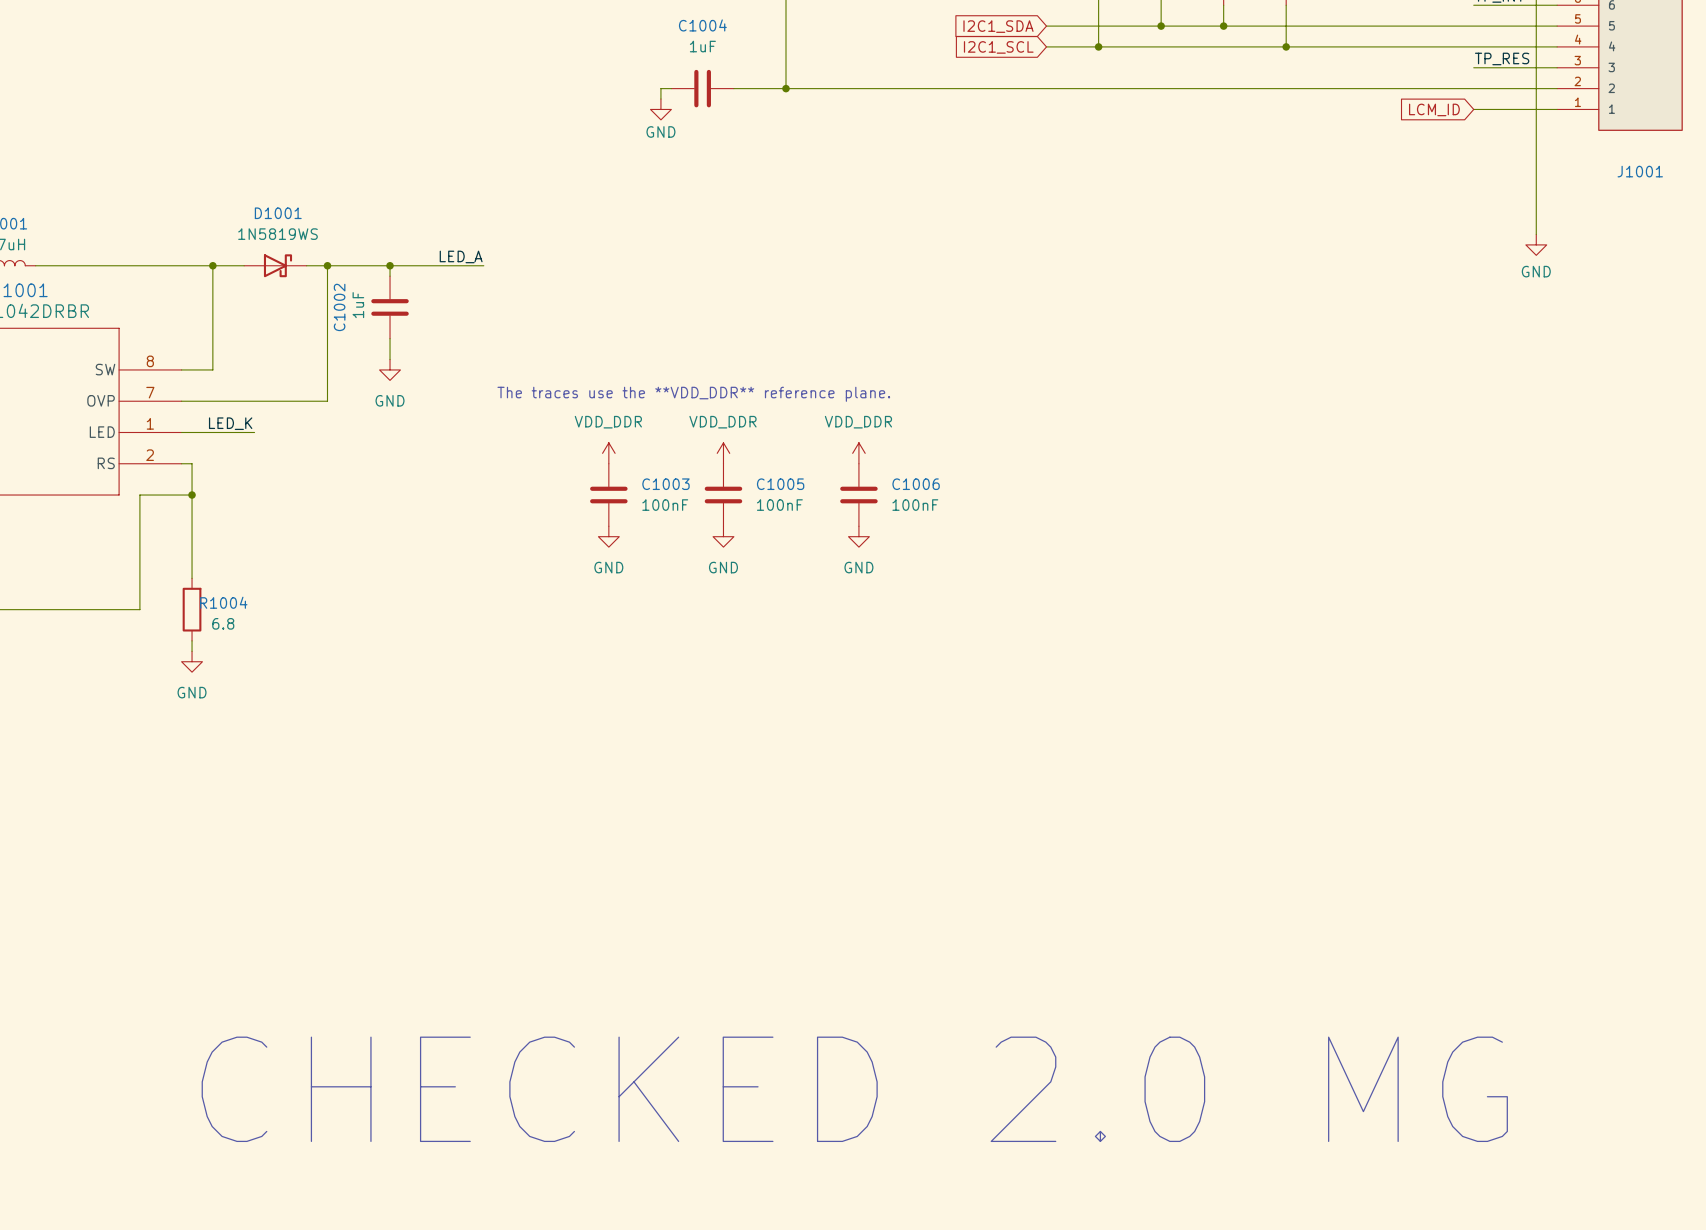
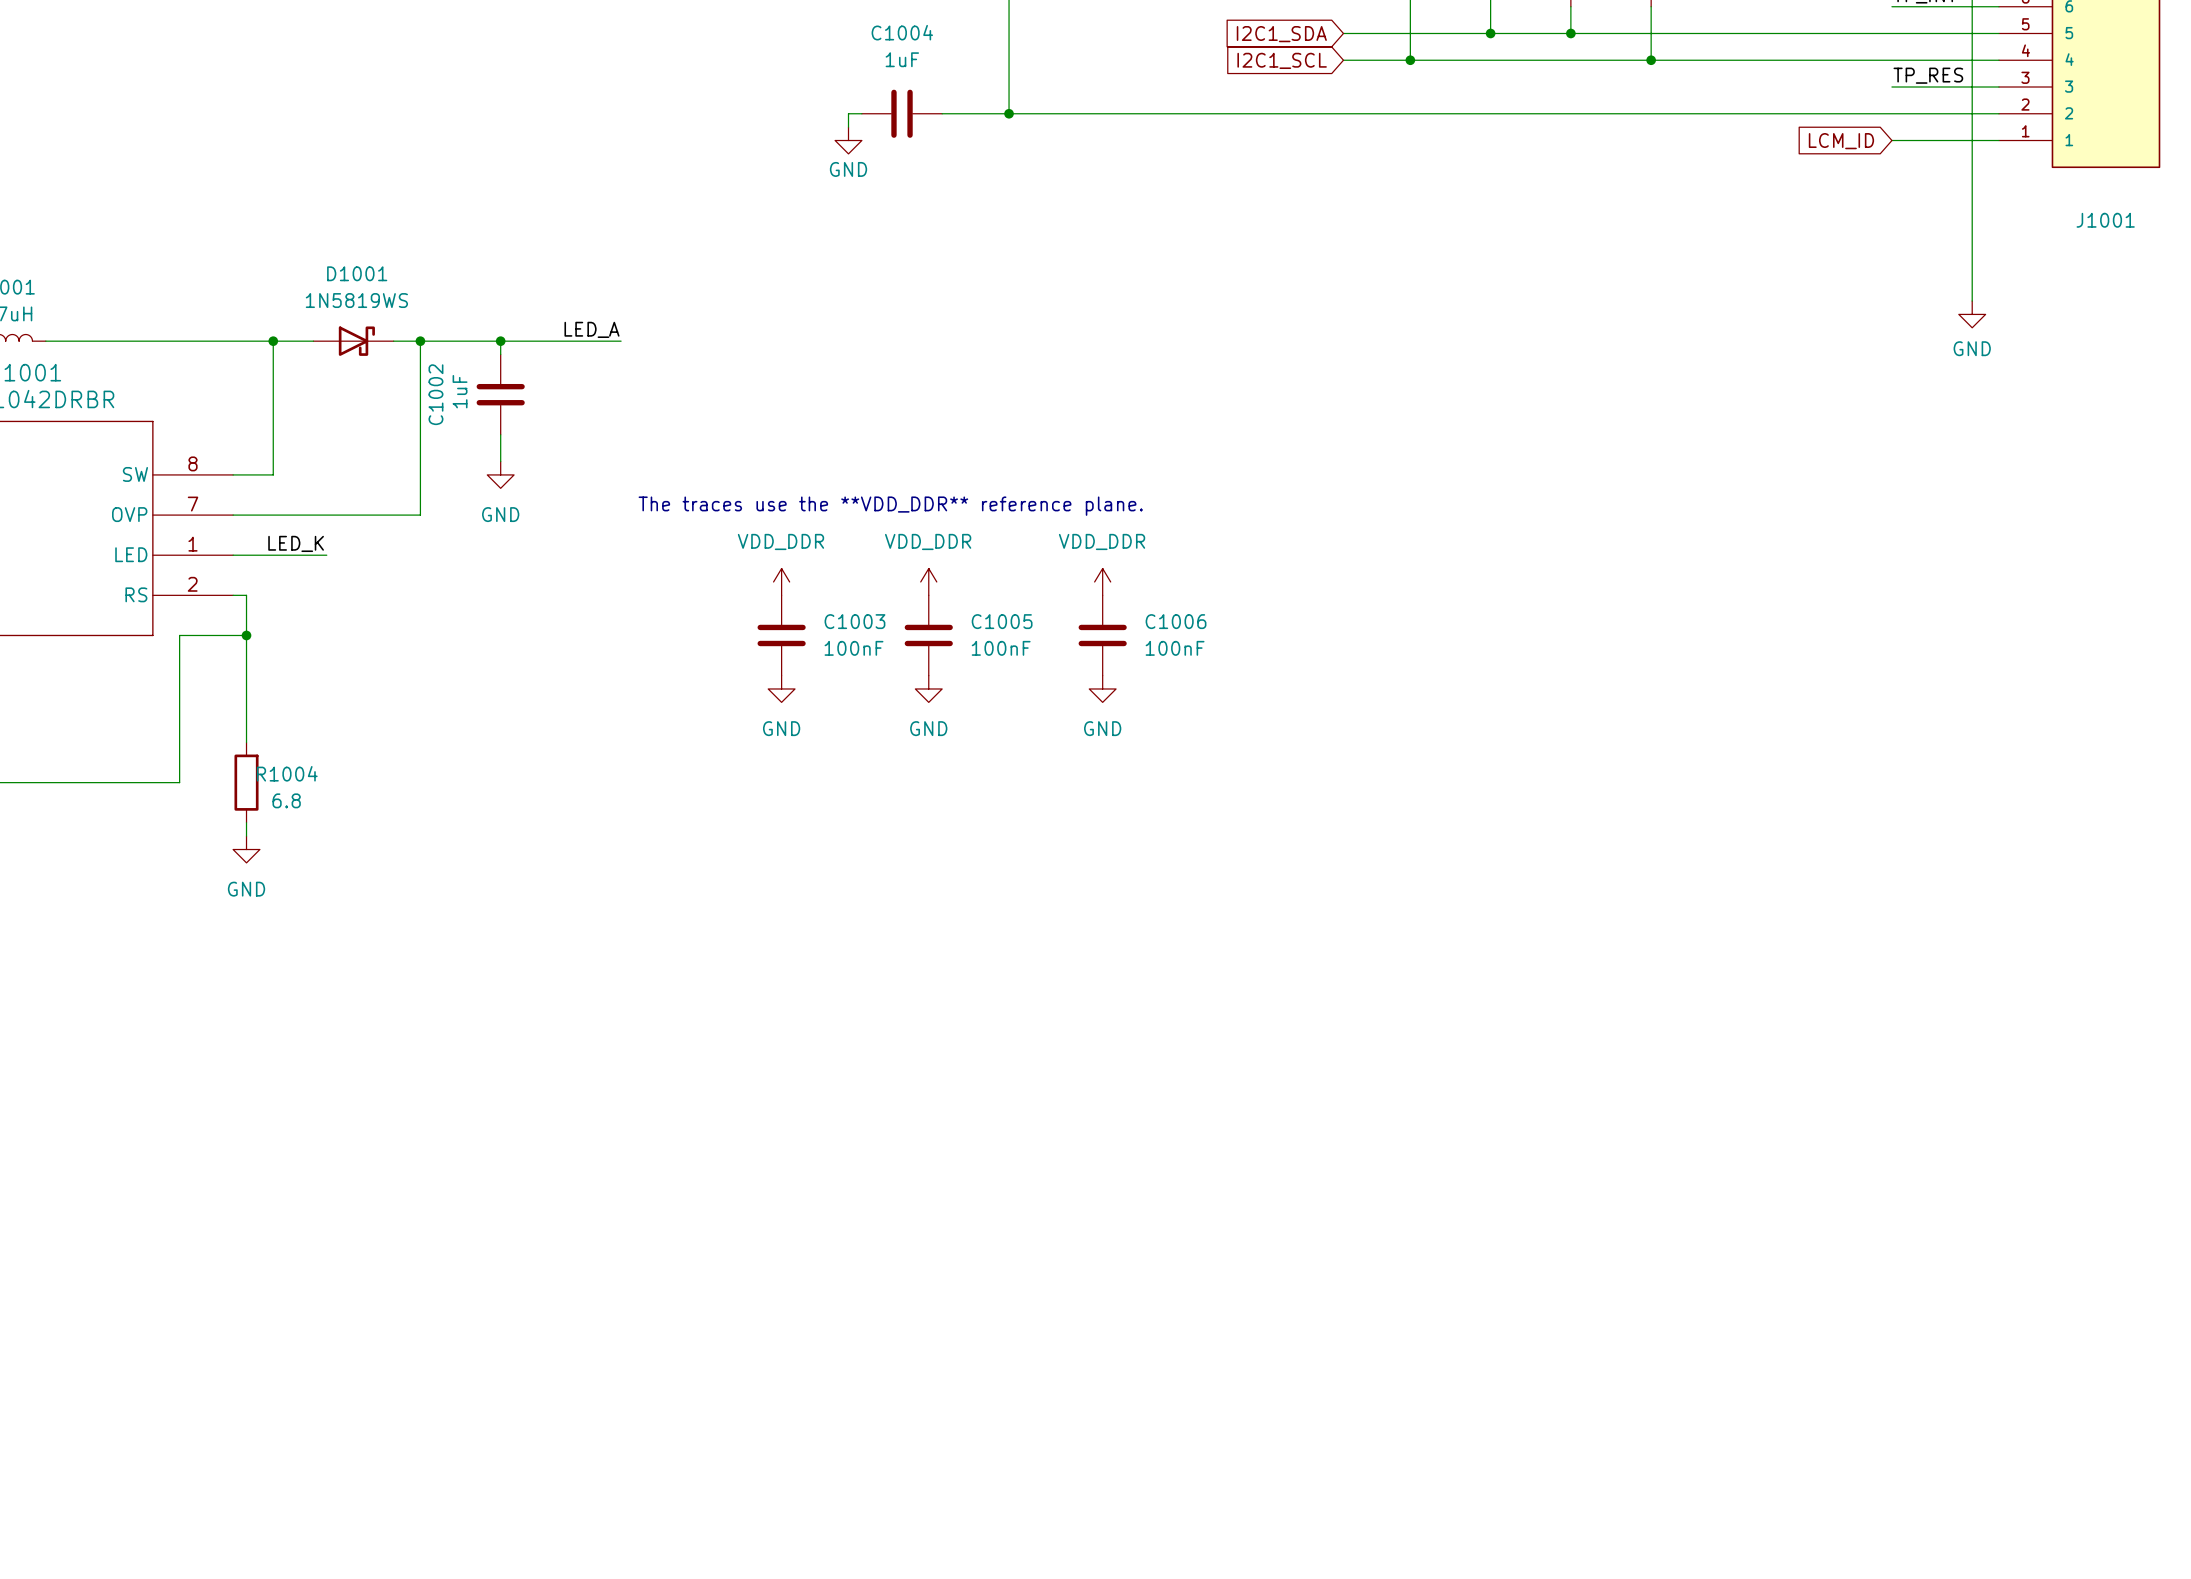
text: CHECKED 2.0 MG (854, 1089) -> none

